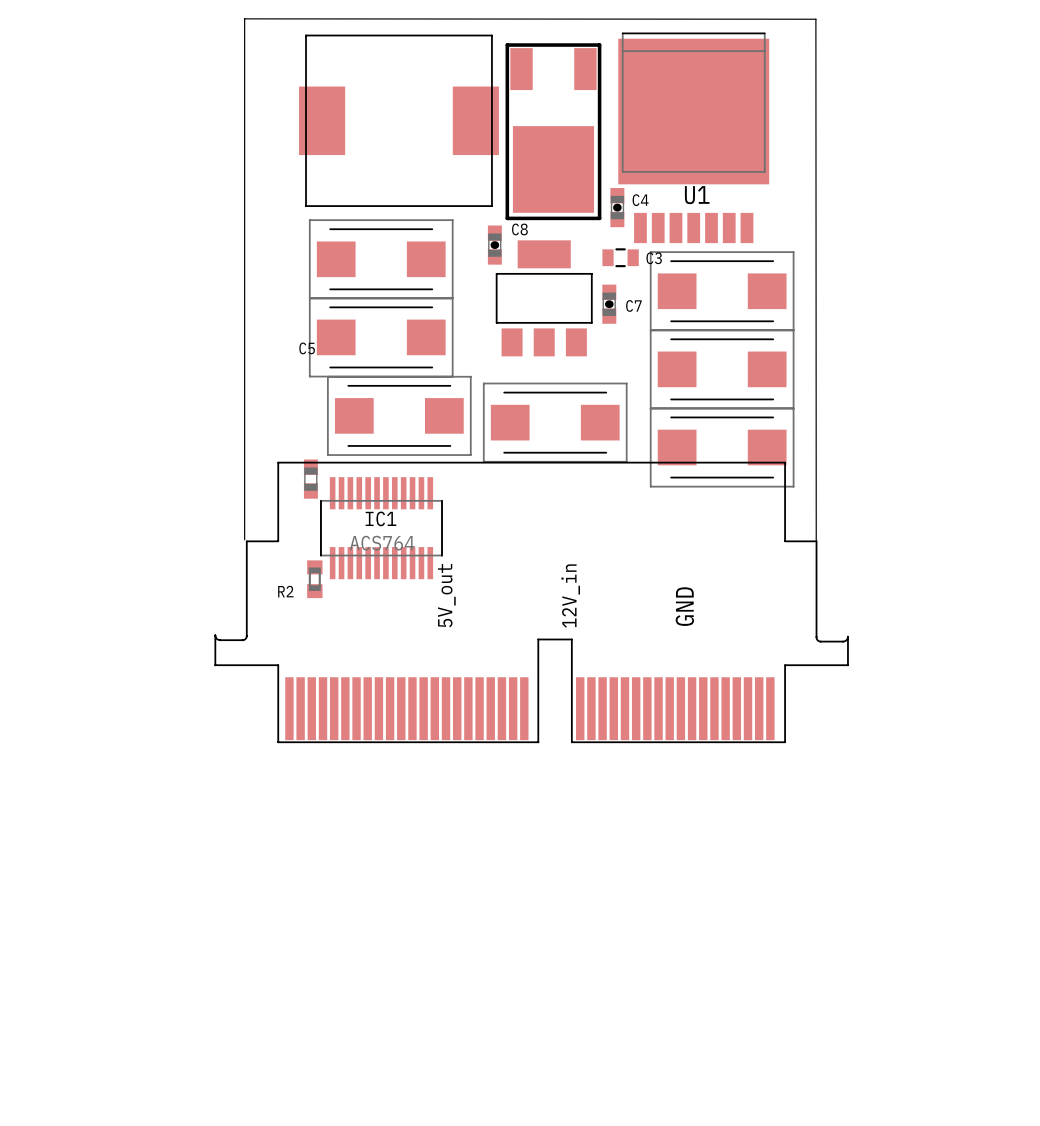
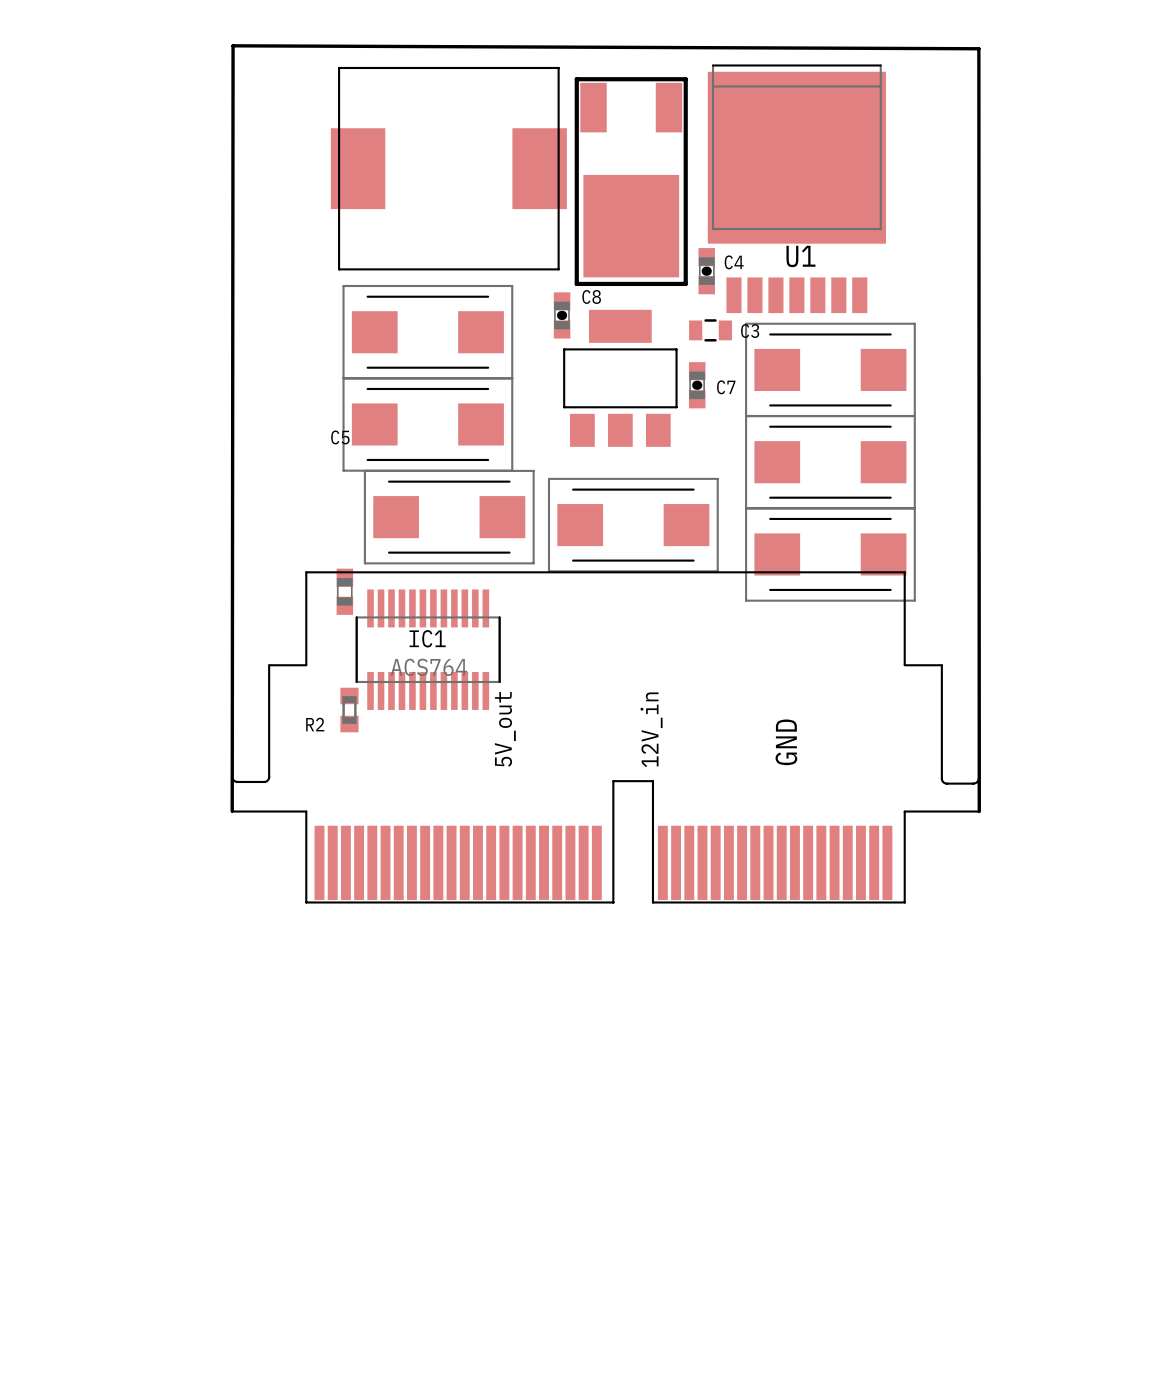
board edge: (244, 539) (244, 18) (815, 19) (816, 540) -> none
board edge: none -> (232, 811) (233, 45) (978, 48) (979, 811)

